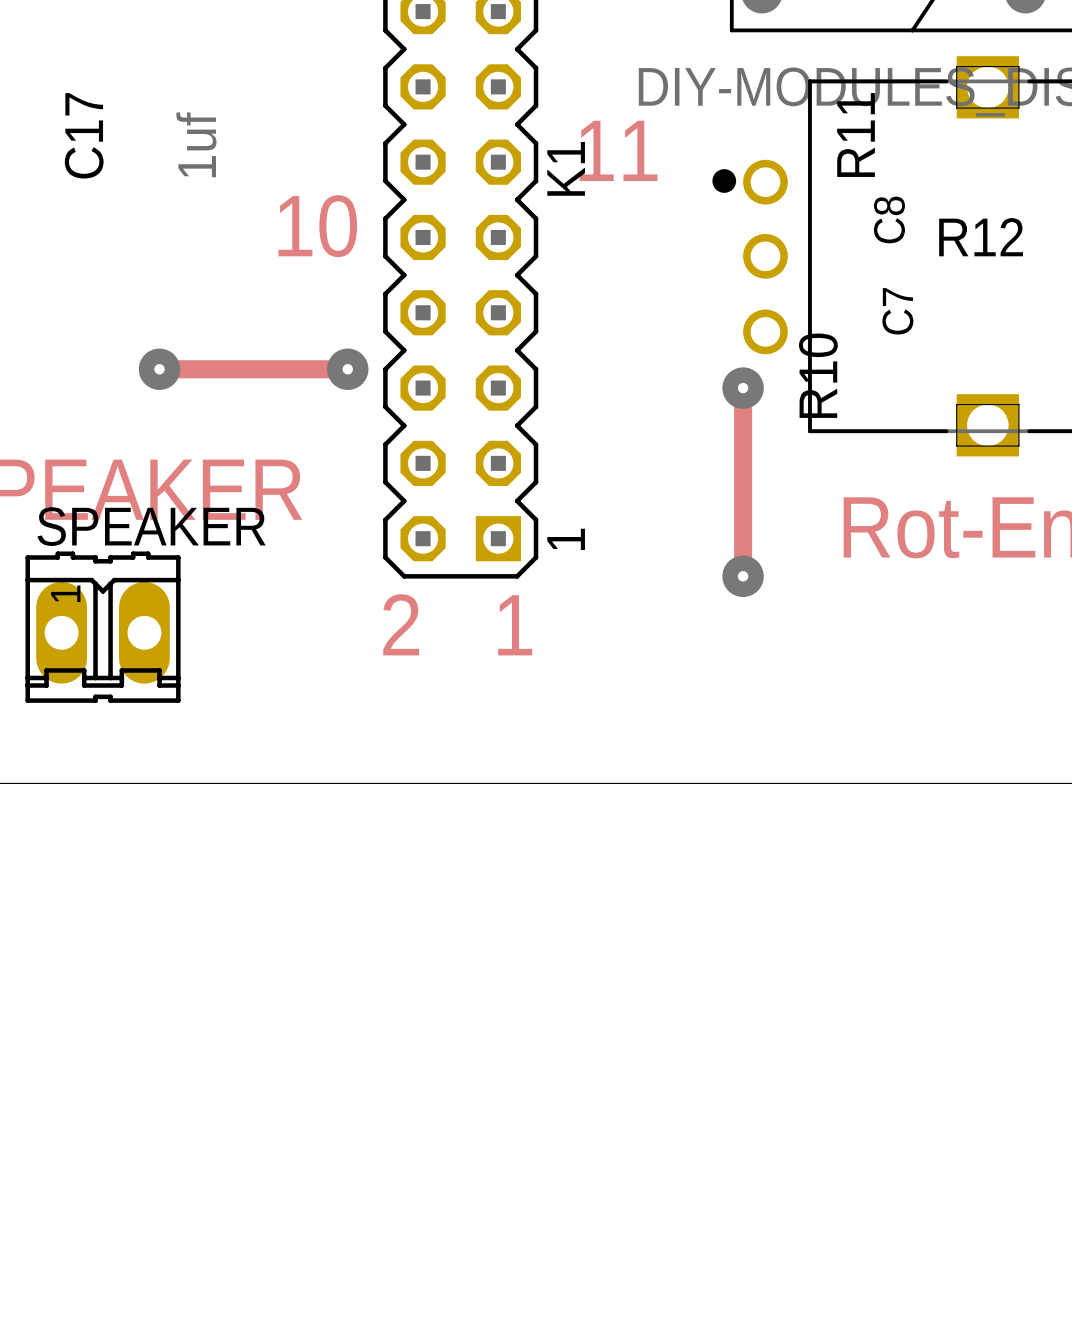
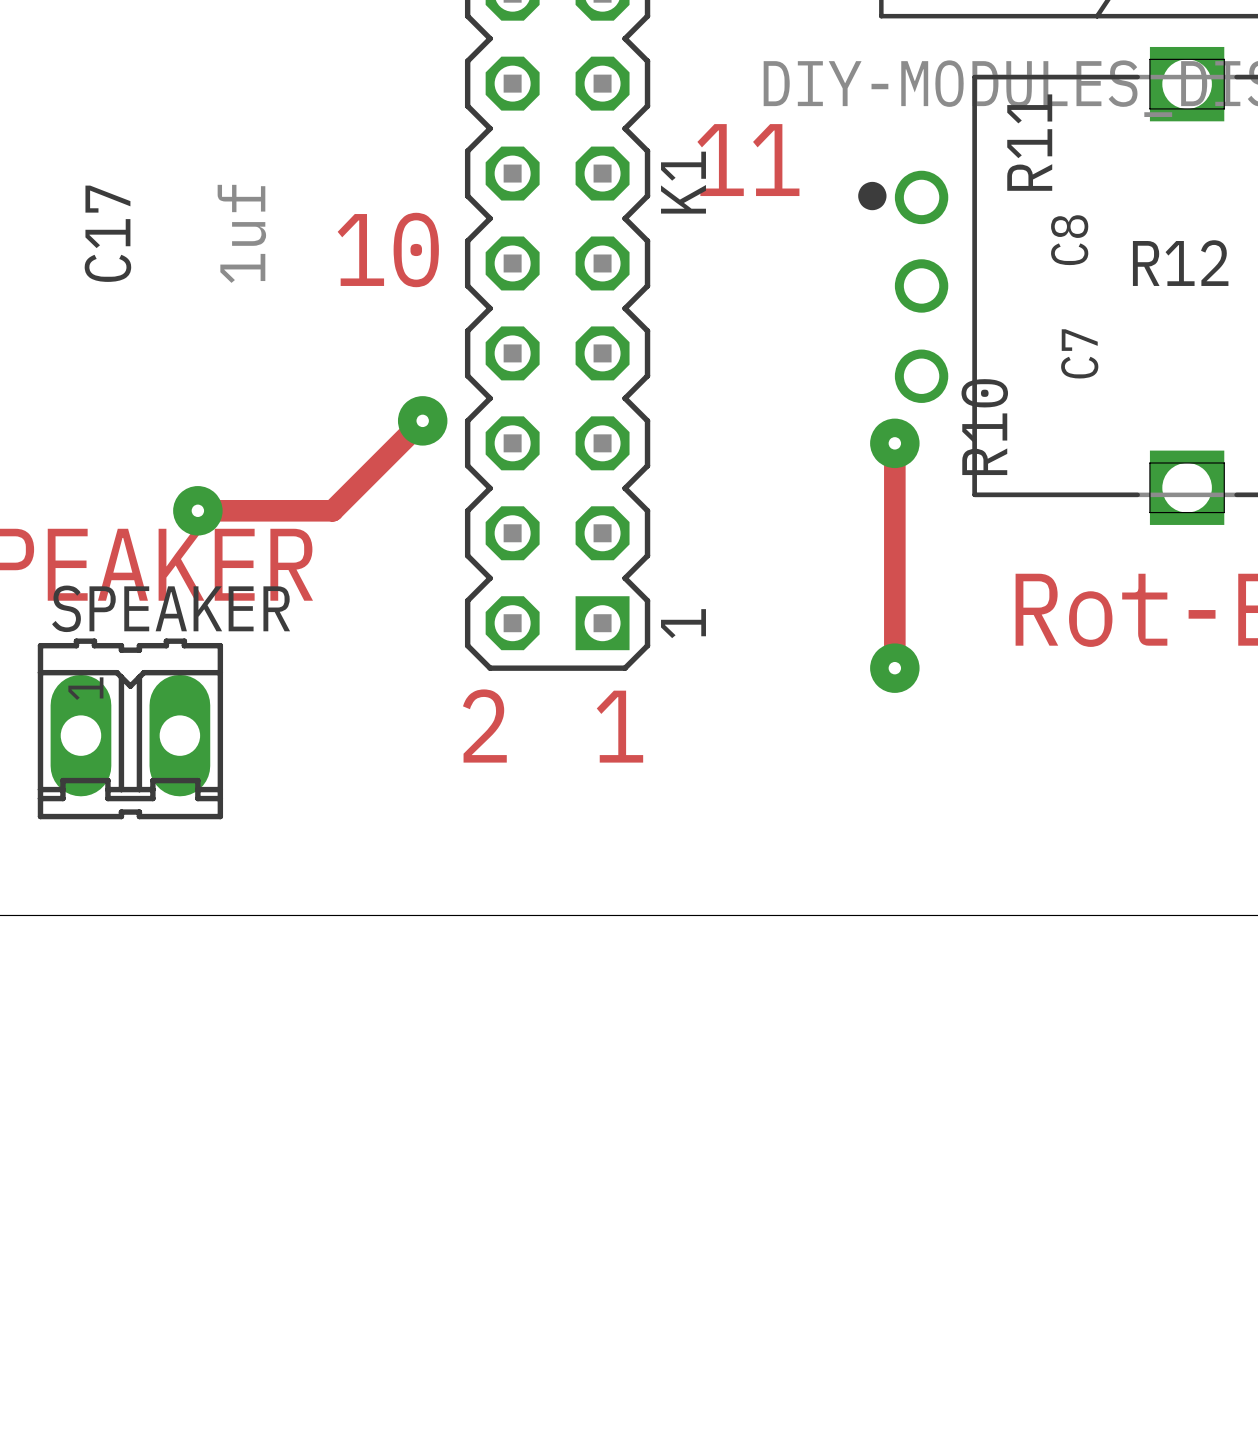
C17 position: (140, 135) -> (175, 233)
track: (159, 369) (347, 369) -> (197, 510) (332, 510) (422, 420)
via position: (159, 369) -> (197, 510)

